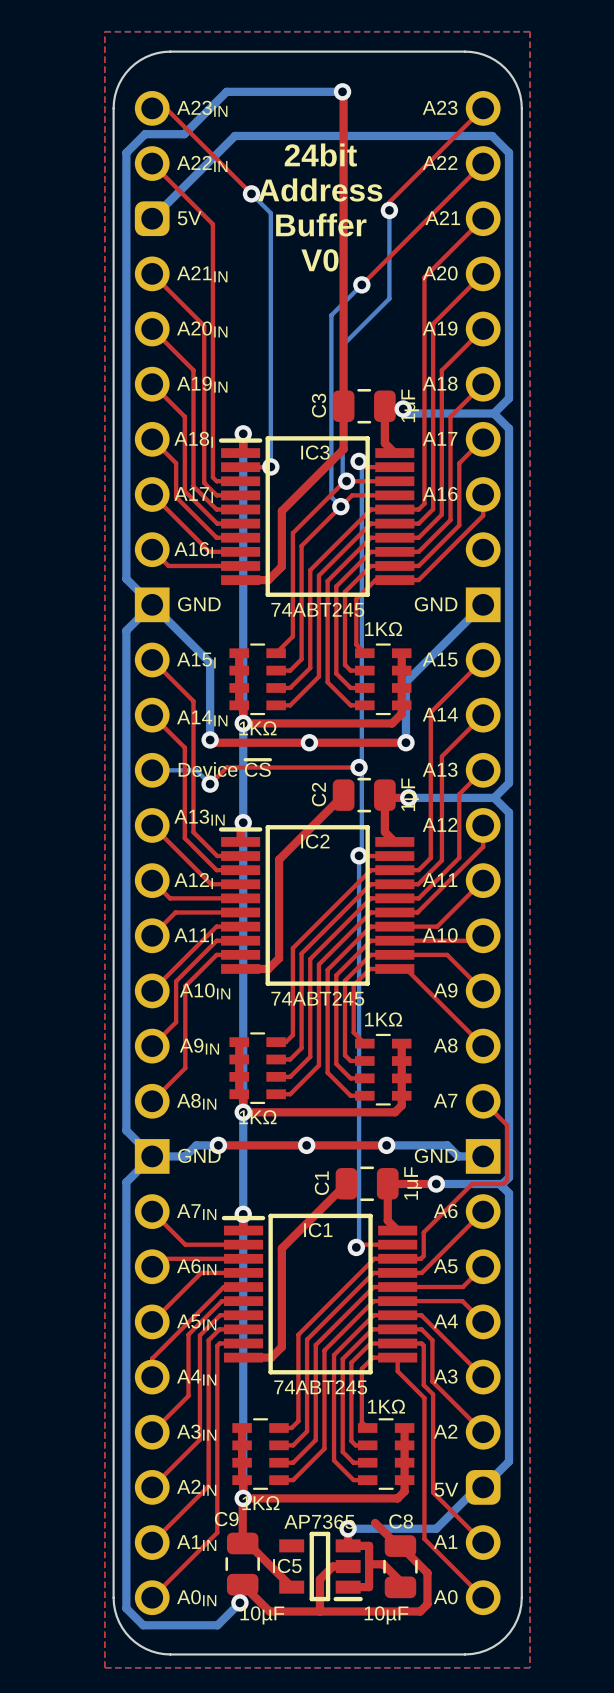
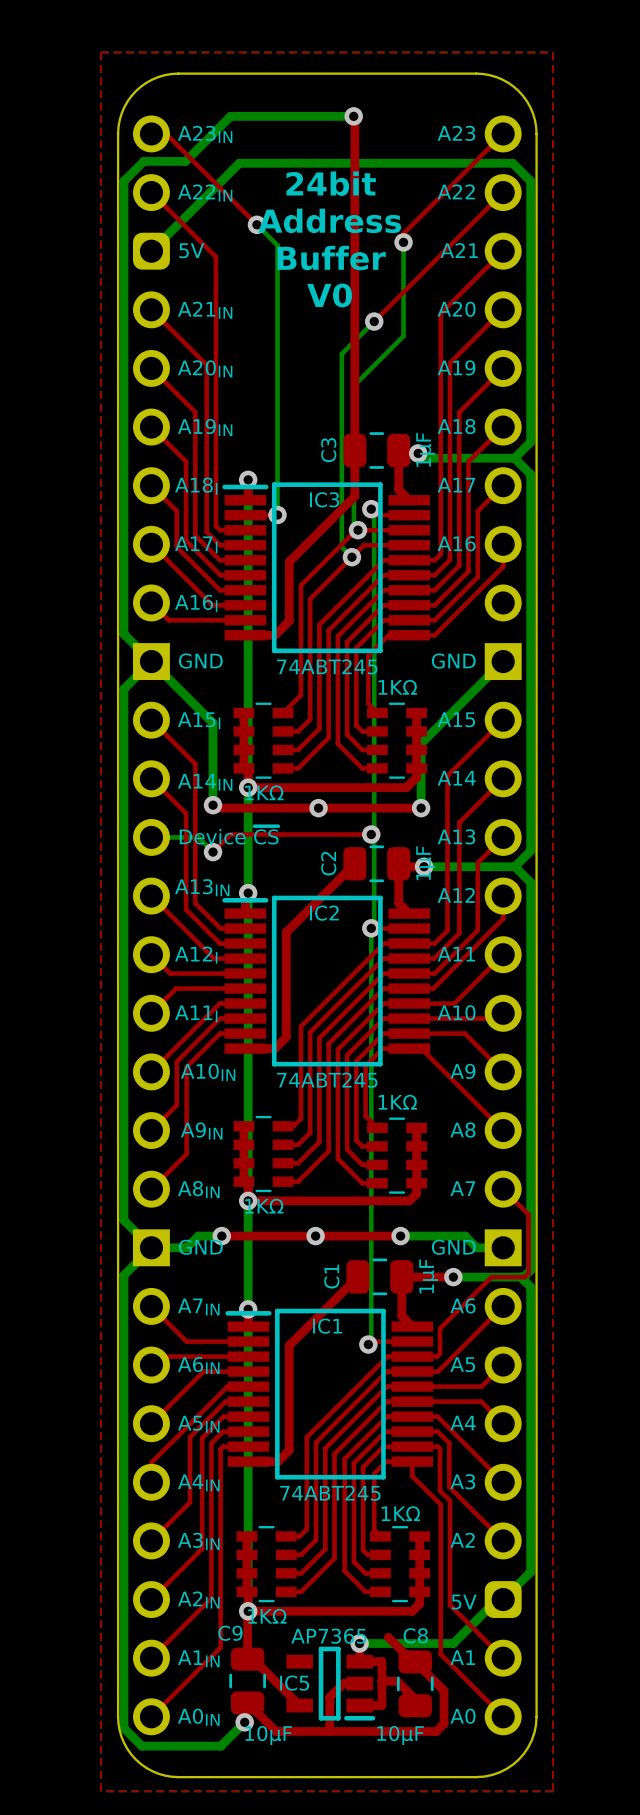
part footprint: [112, 50, 523, 1656] -> [116, 72, 538, 1779]

